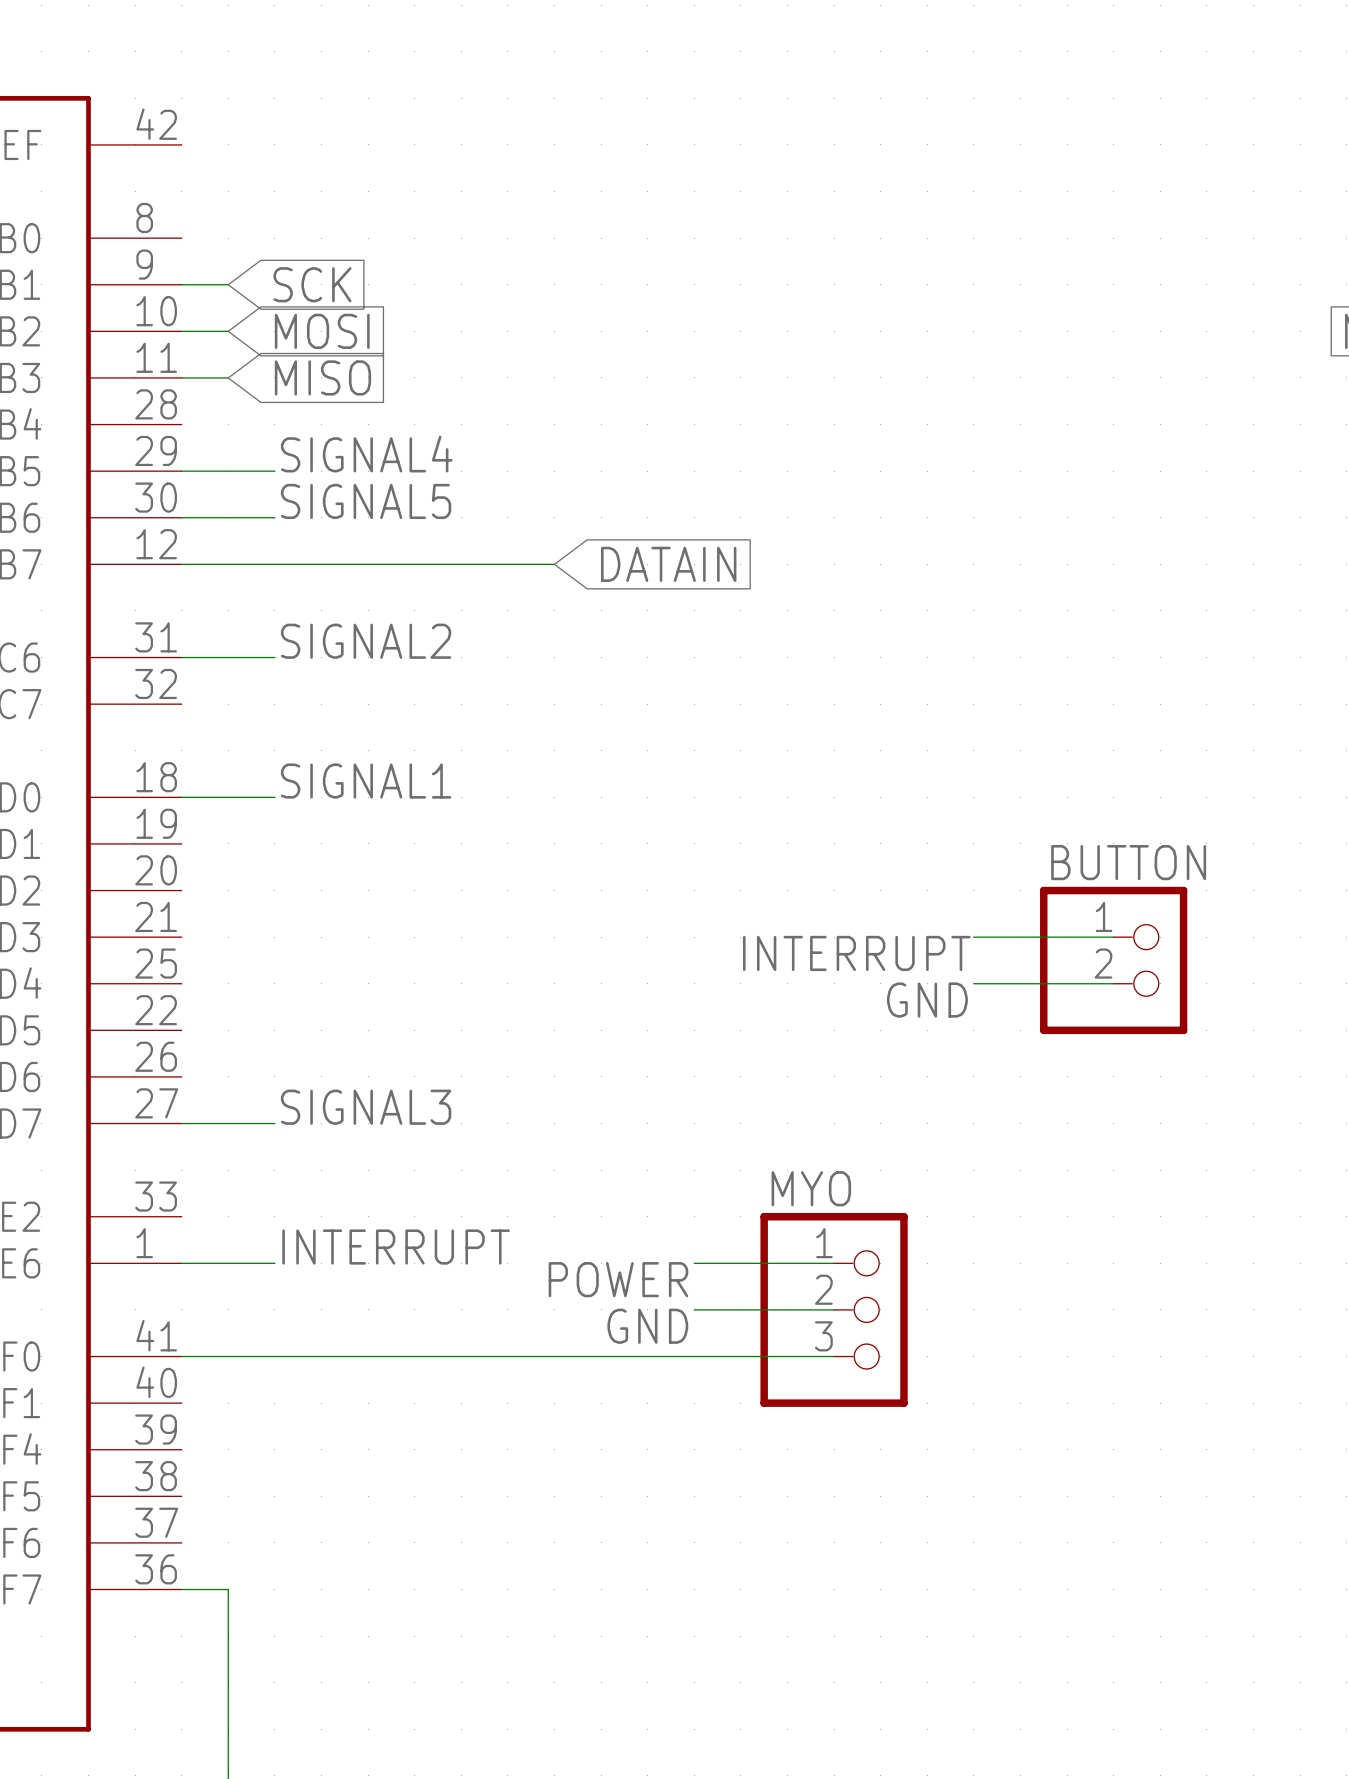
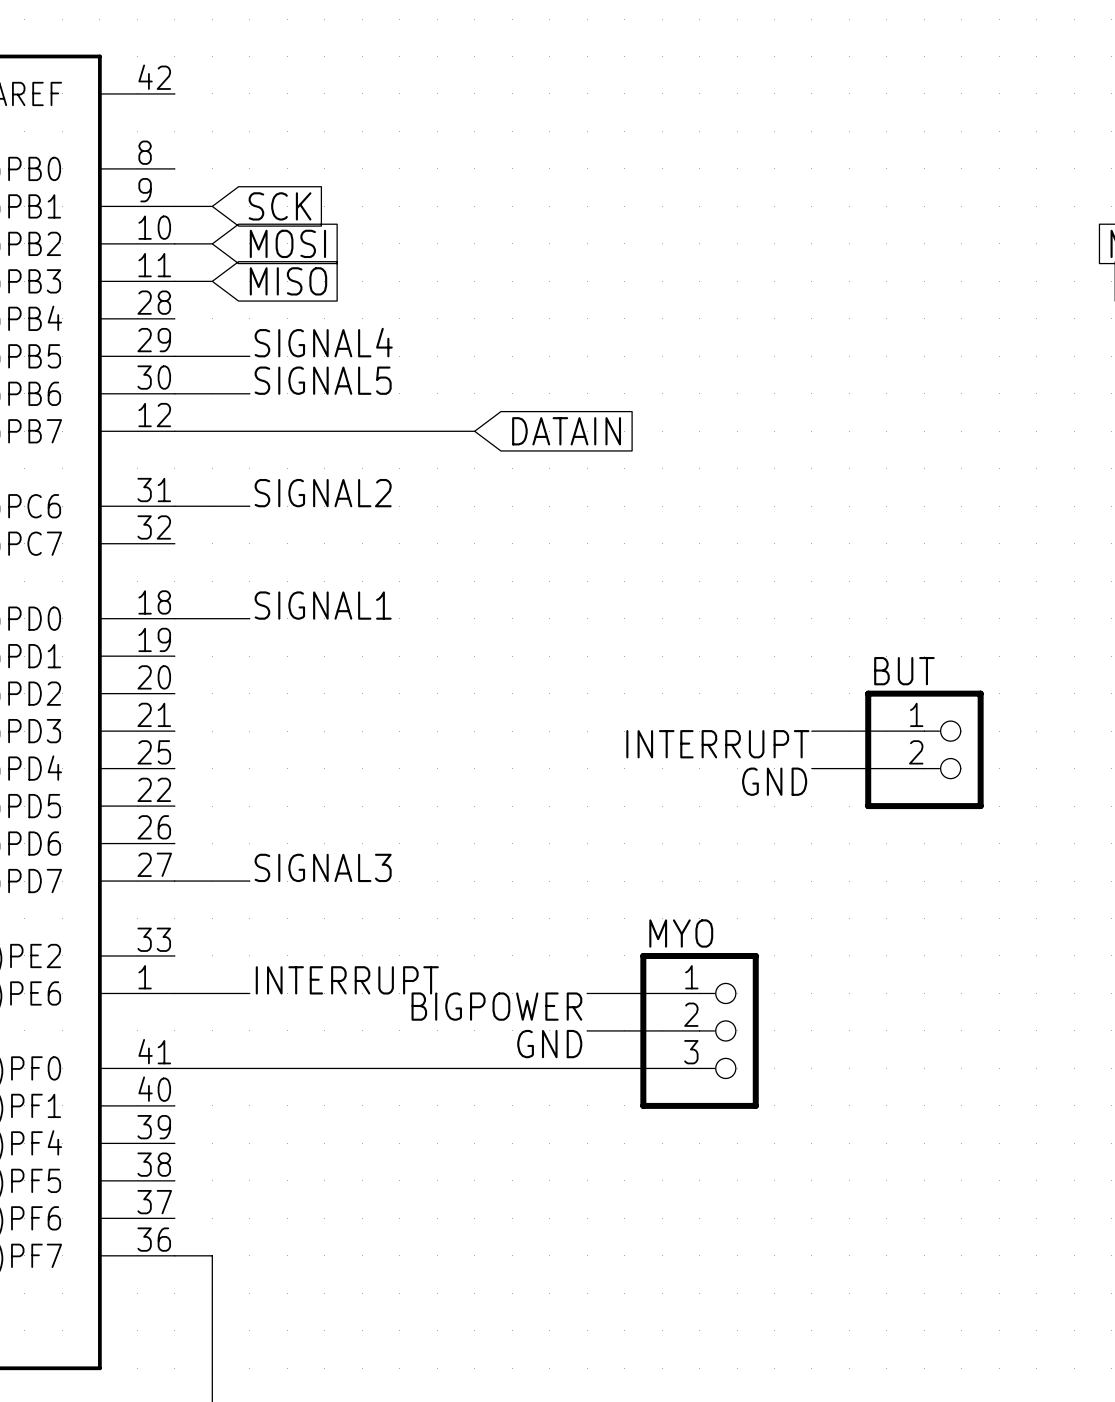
BUTTON name: BUTTON (1128, 862) -> BUT (904, 671)
label: POWER (618, 1279) -> BIGPOWER (496, 1006)

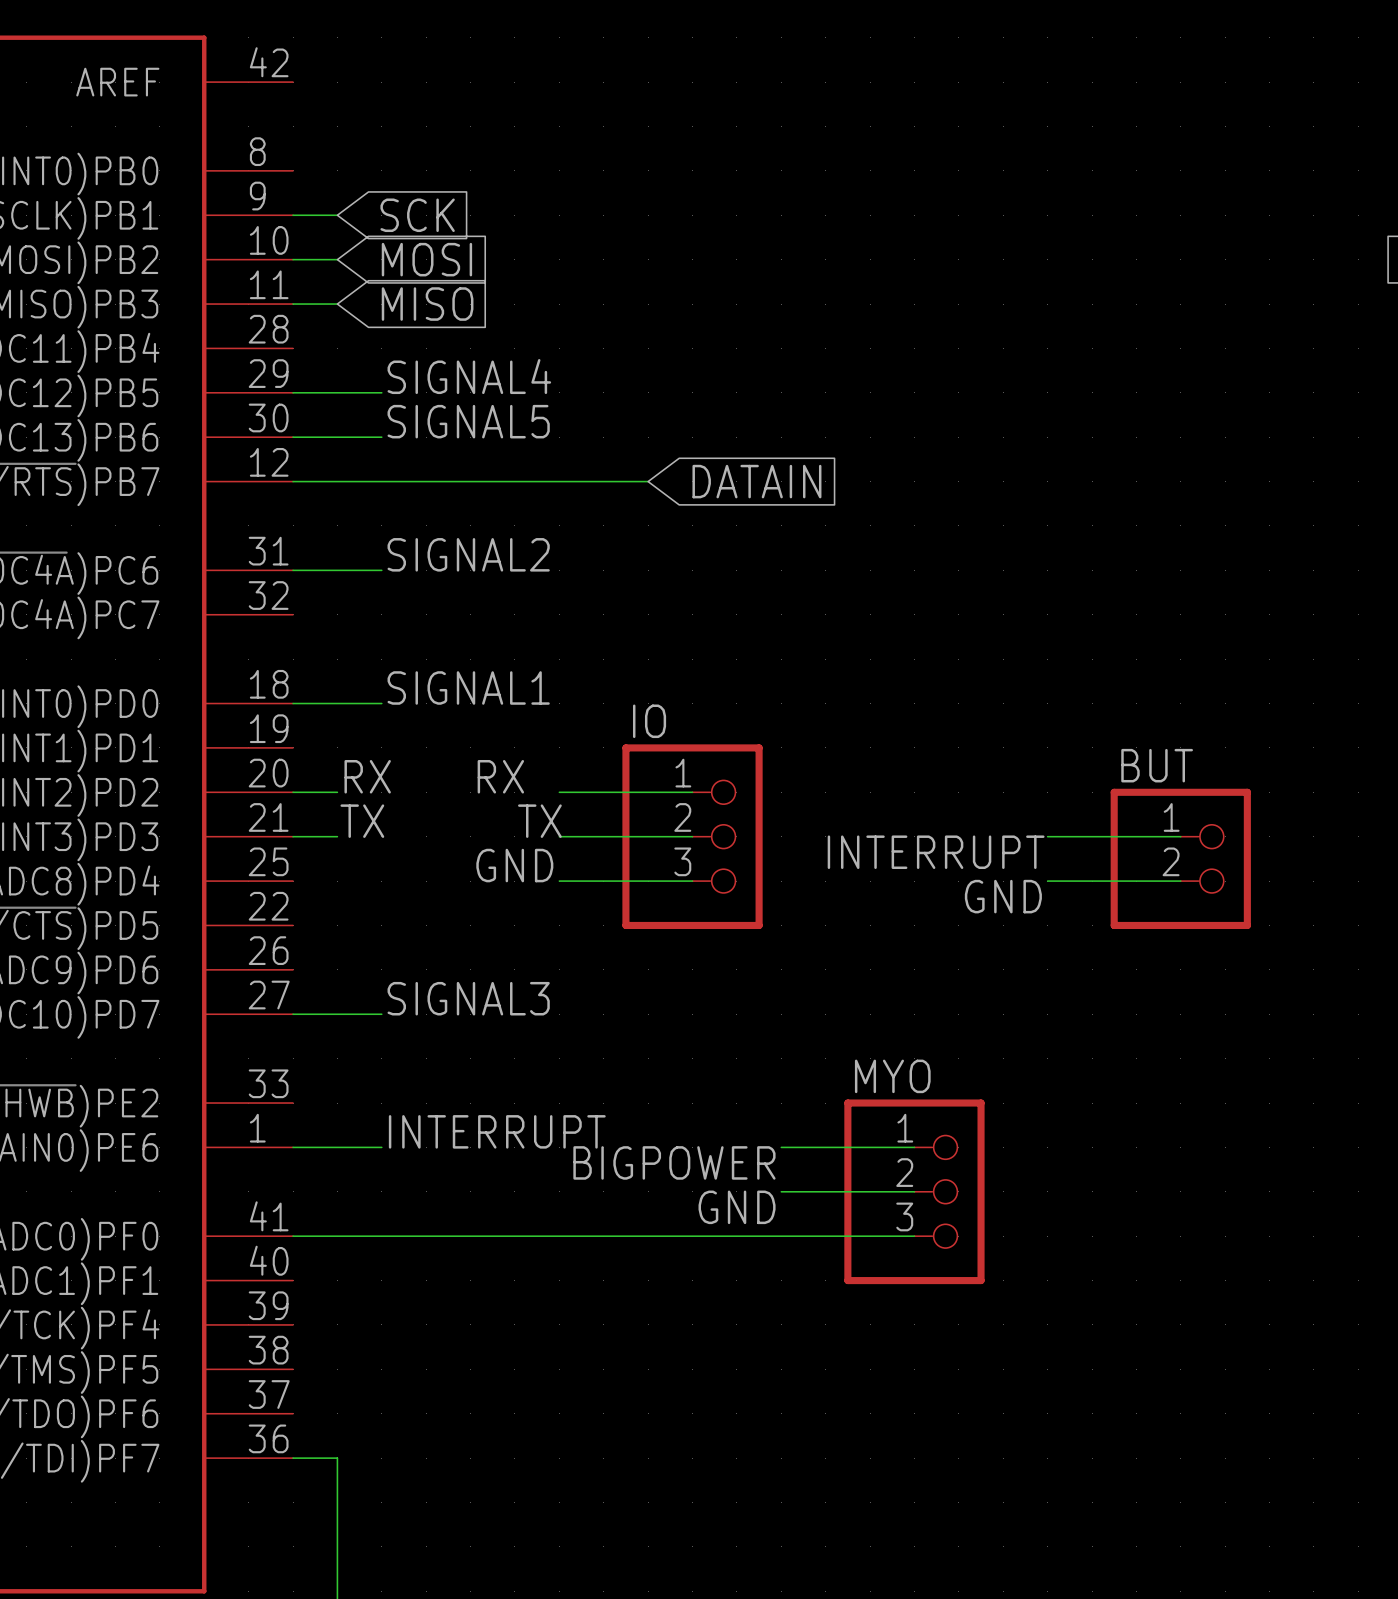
label: none -> RX (367, 776)
label: none -> RX (500, 776)
wire: none -> (293, 792) (337, 792)
wire: none -> (559, 792) (692, 792)
label: none -> TX (362, 821)
label: none -> TX (539, 821)
wire: none -> (293, 836) (337, 836)
wire: none -> (559, 836) (692, 836)
IO: none -> (692, 836)
label: none -> GND (514, 865)
wire: none -> (559, 881) (692, 881)

